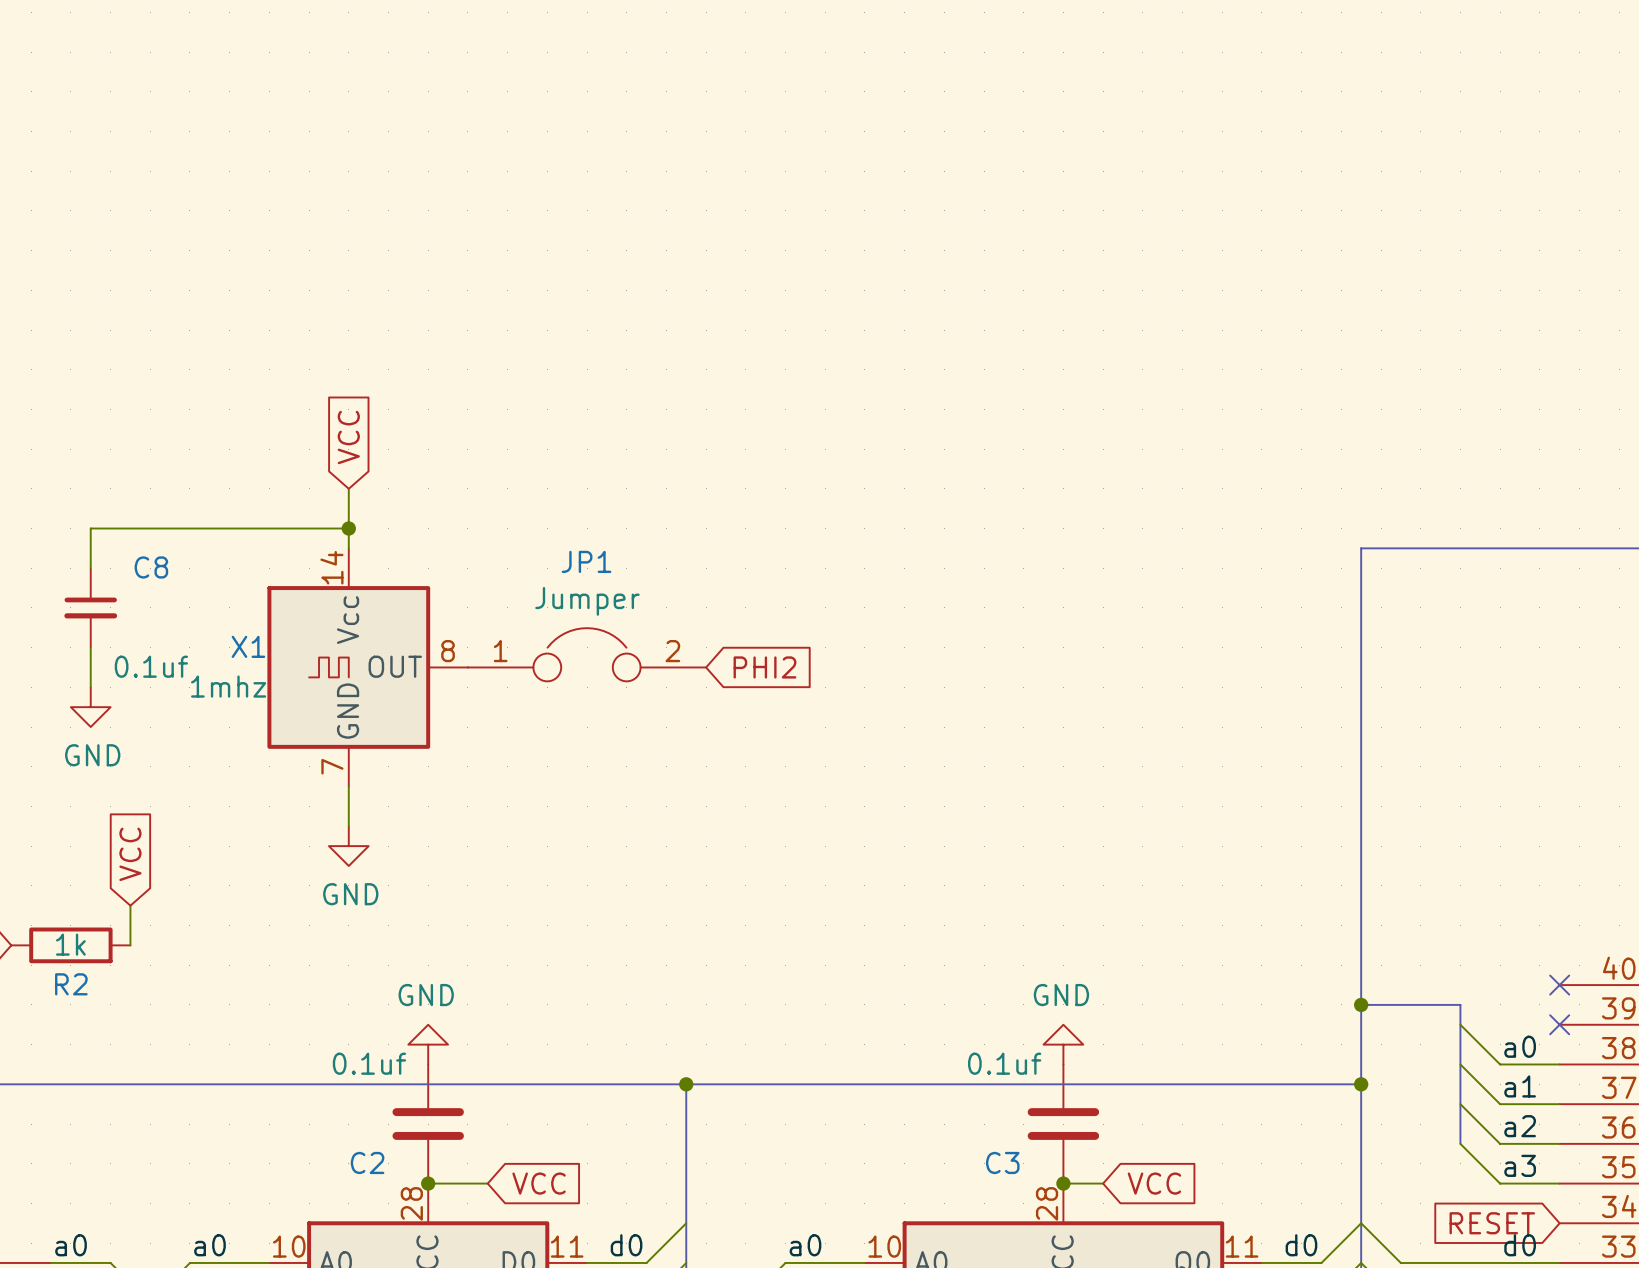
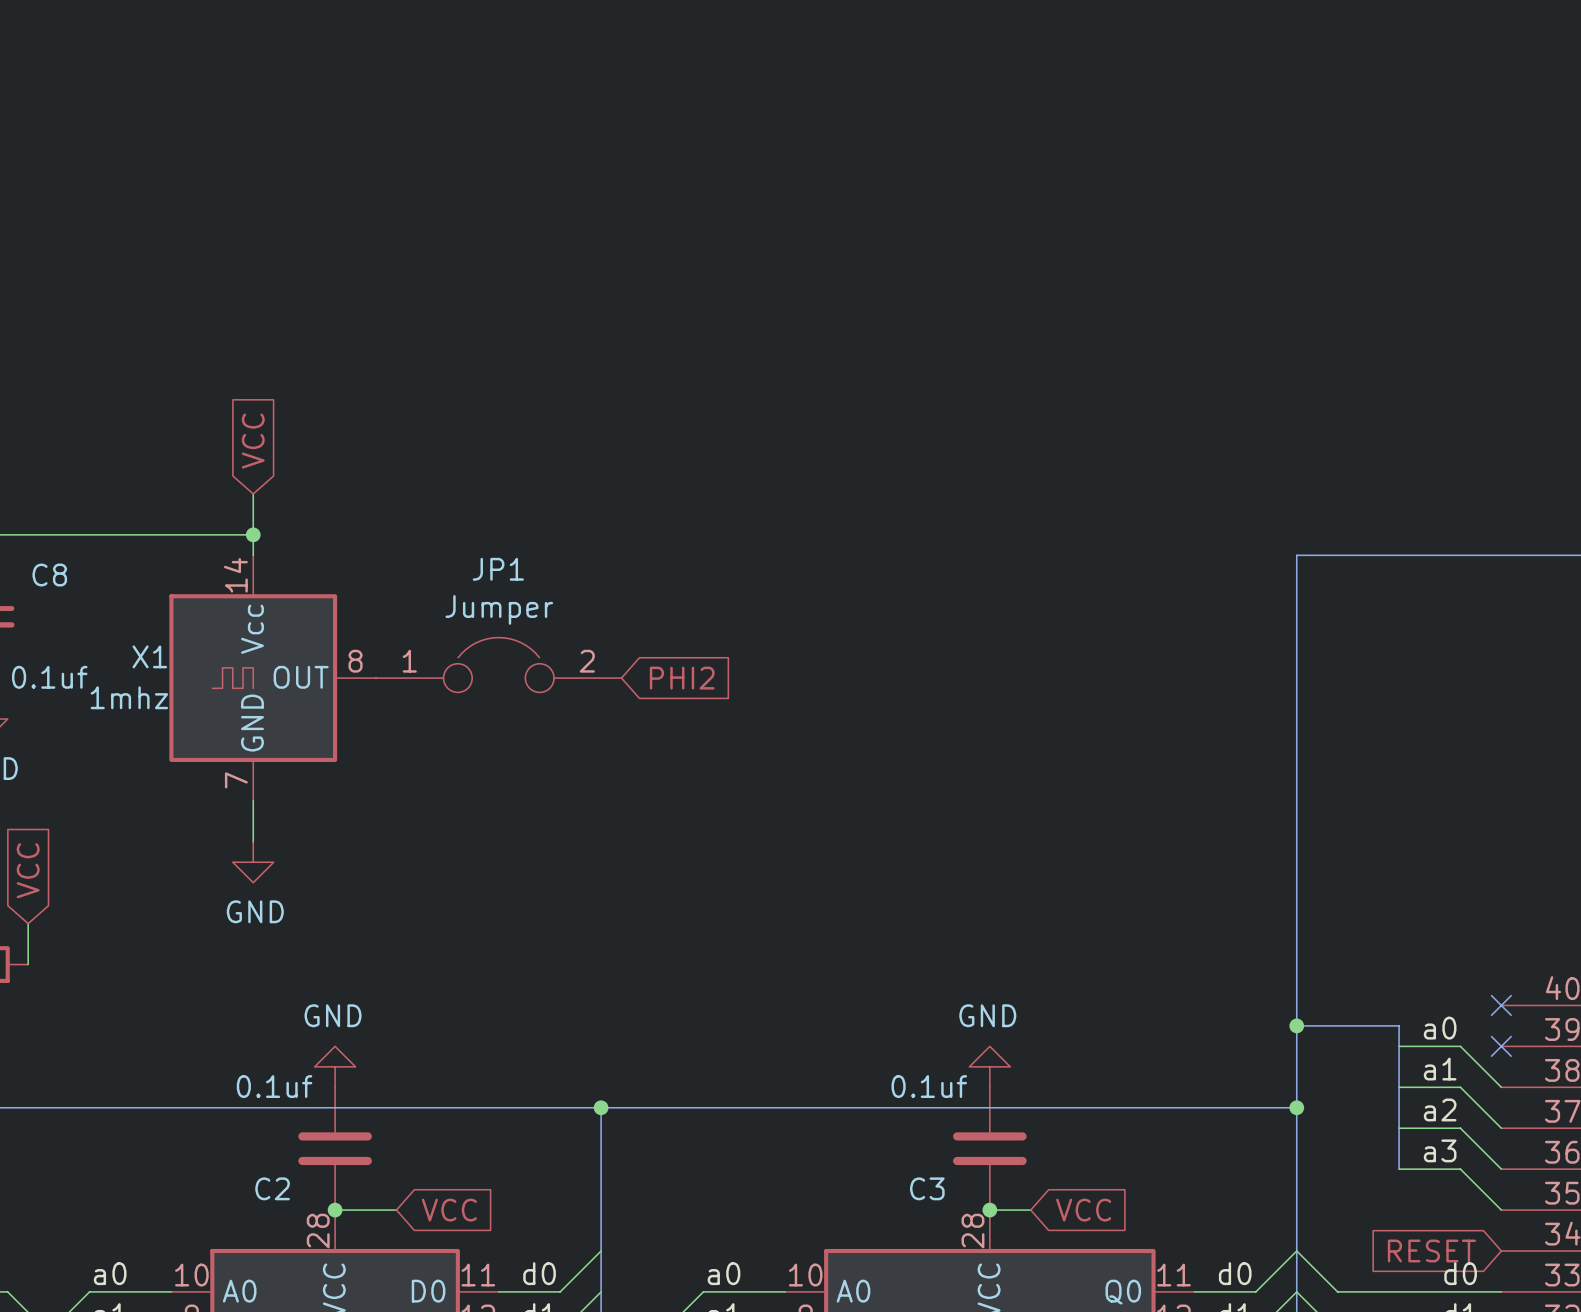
wire: (1460, 1024) (1500, 1064) -> (1399, 1087) (1439, 1087)
wire: none -> (1399, 1046) (1460, 1046) (1501, 1087)
label position: a0 (1520, 1046) -> a0 (1440, 1028)
wire: (1460, 1064) (1500, 1104) -> (1399, 1128) (1439, 1128)
wire: (1519, 1064) (1559, 1064) -> (1460, 1087) (1501, 1128)
label position: a1 (1520, 1086) -> a1 (1440, 1069)
wire: (1460, 1104) (1500, 1143) -> (1399, 1169) (1439, 1169)
wire: (1519, 1104) (1559, 1104) -> (1460, 1128) (1501, 1169)
label position: a2 (1520, 1126) -> a2 (1440, 1109)
wire: (1460, 1143) (1500, 1183) (1559, 1183) -> none
wire: (1519, 1143) (1559, 1143) -> (1460, 1169) (1501, 1210)
label position: a3 (1520, 1165) -> a3 (1440, 1150)

